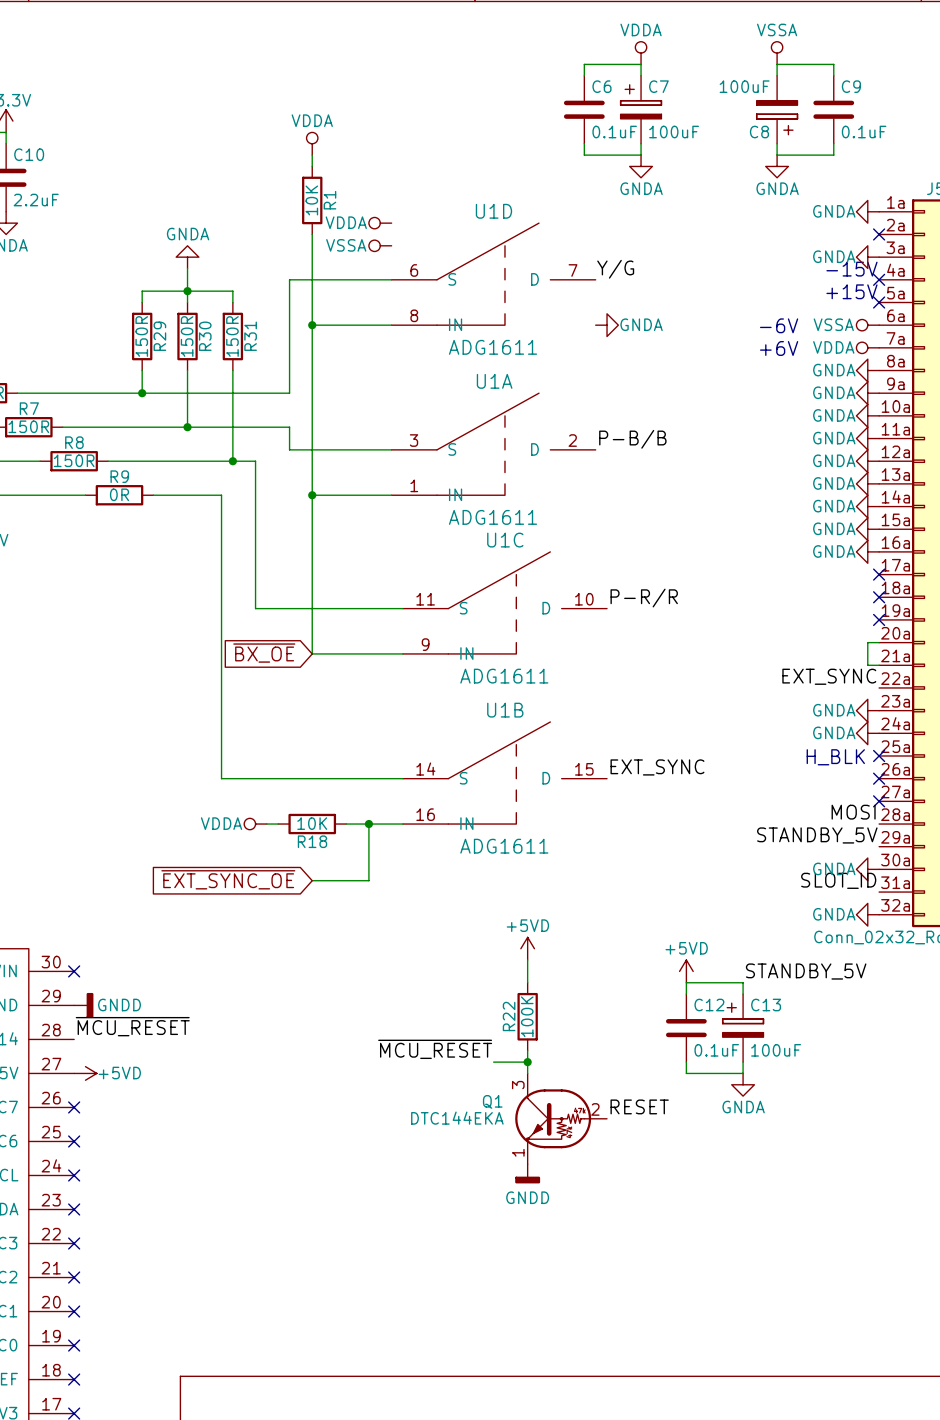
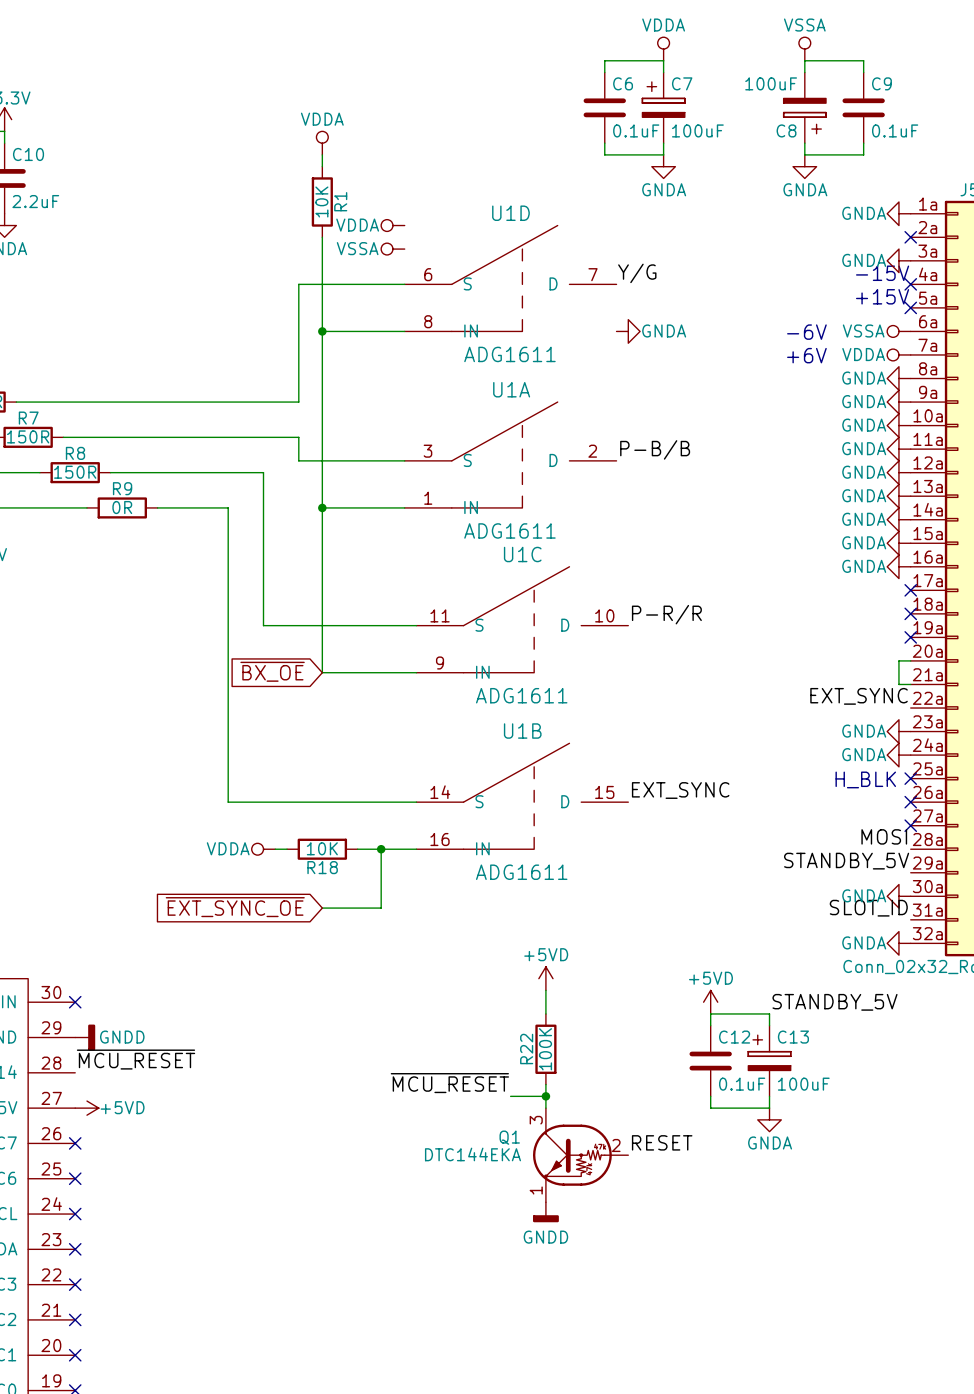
power symbol: GNDA (187, 257) -> none
wire: (187, 268) (187, 302) -> none
junction: (187, 291) -> none
wire: (142, 302) (142, 291) (232, 291) (232, 302) -> none
R29: 150R (142, 336) -> none
R30: 150R (187, 336) -> none
R31: 150R (232, 336) -> none
wire: (142, 370) (142, 393) -> none
wire: (187, 370) (187, 427) -> none
wire: (232, 370) (232, 461) -> none
junction: (142, 393) -> none
junction: (187, 427) -> none
junction: (232, 461) -> none

